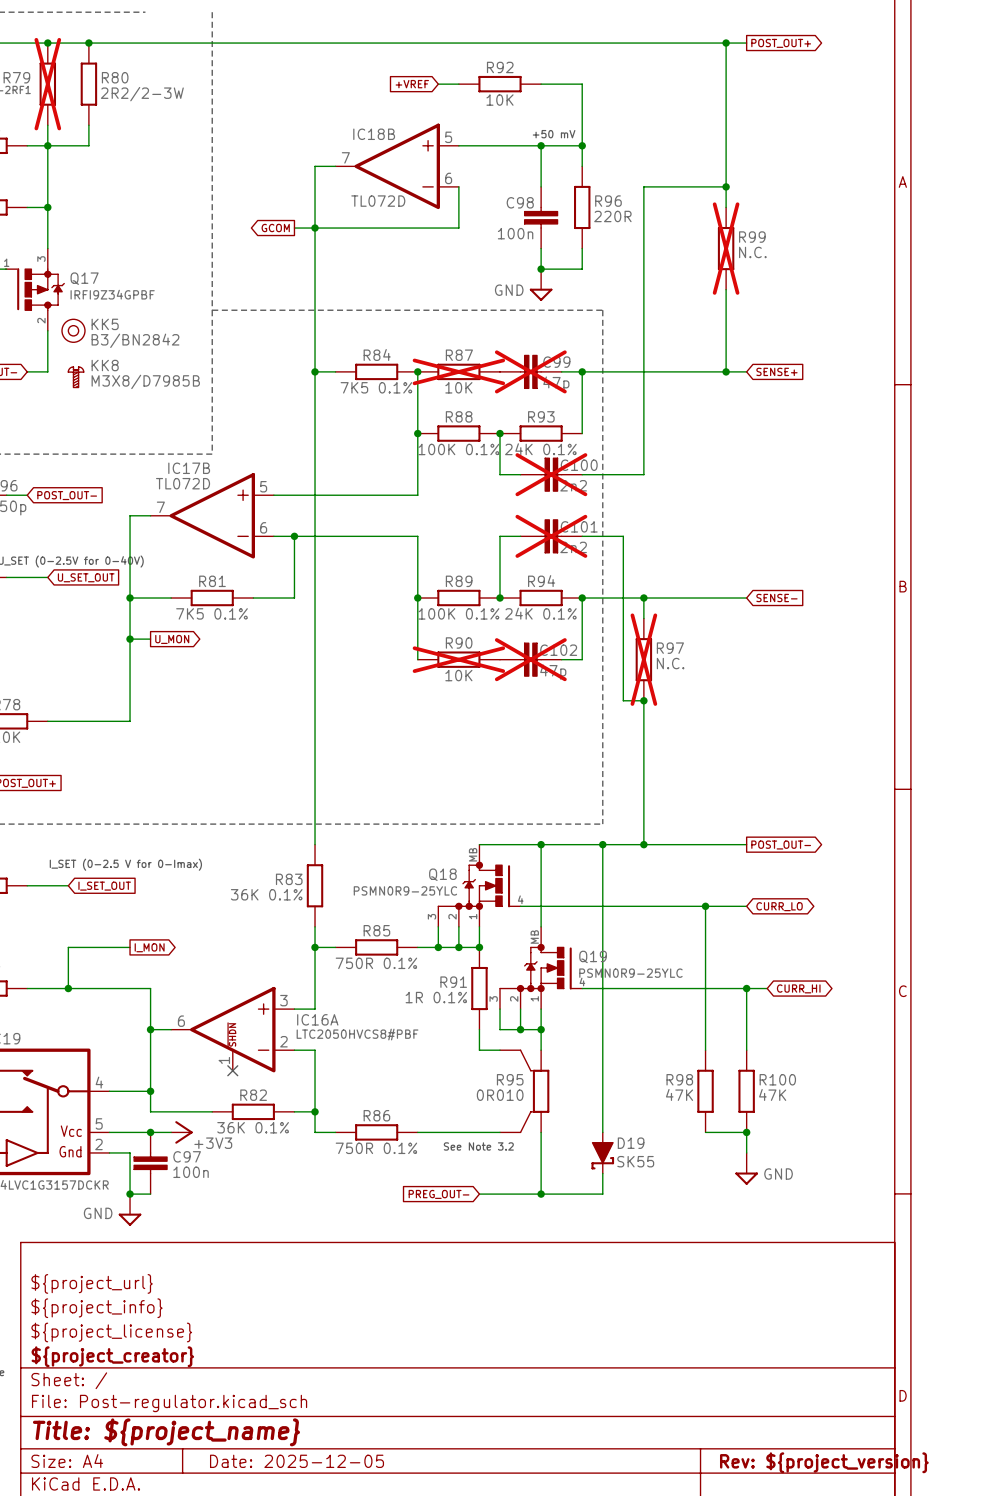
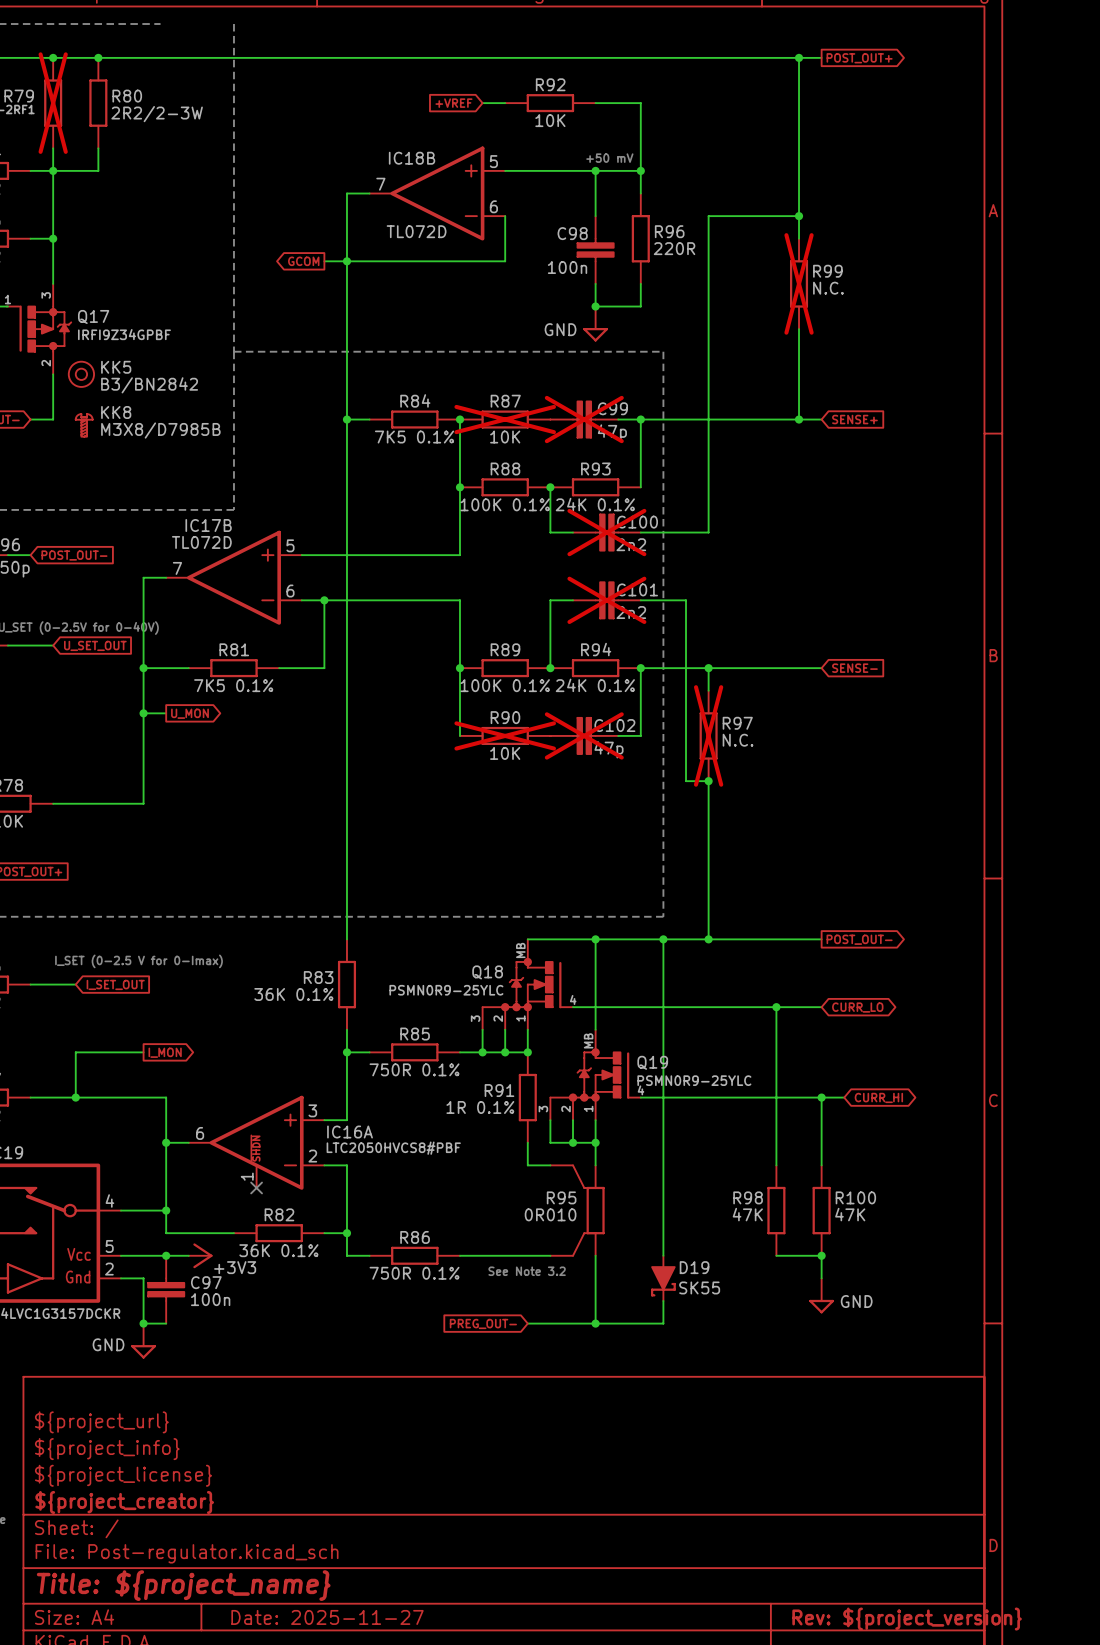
title block: Date: 2025-12-05 (297, 1461) -> Date: 2025-11-27 (327, 1617)

